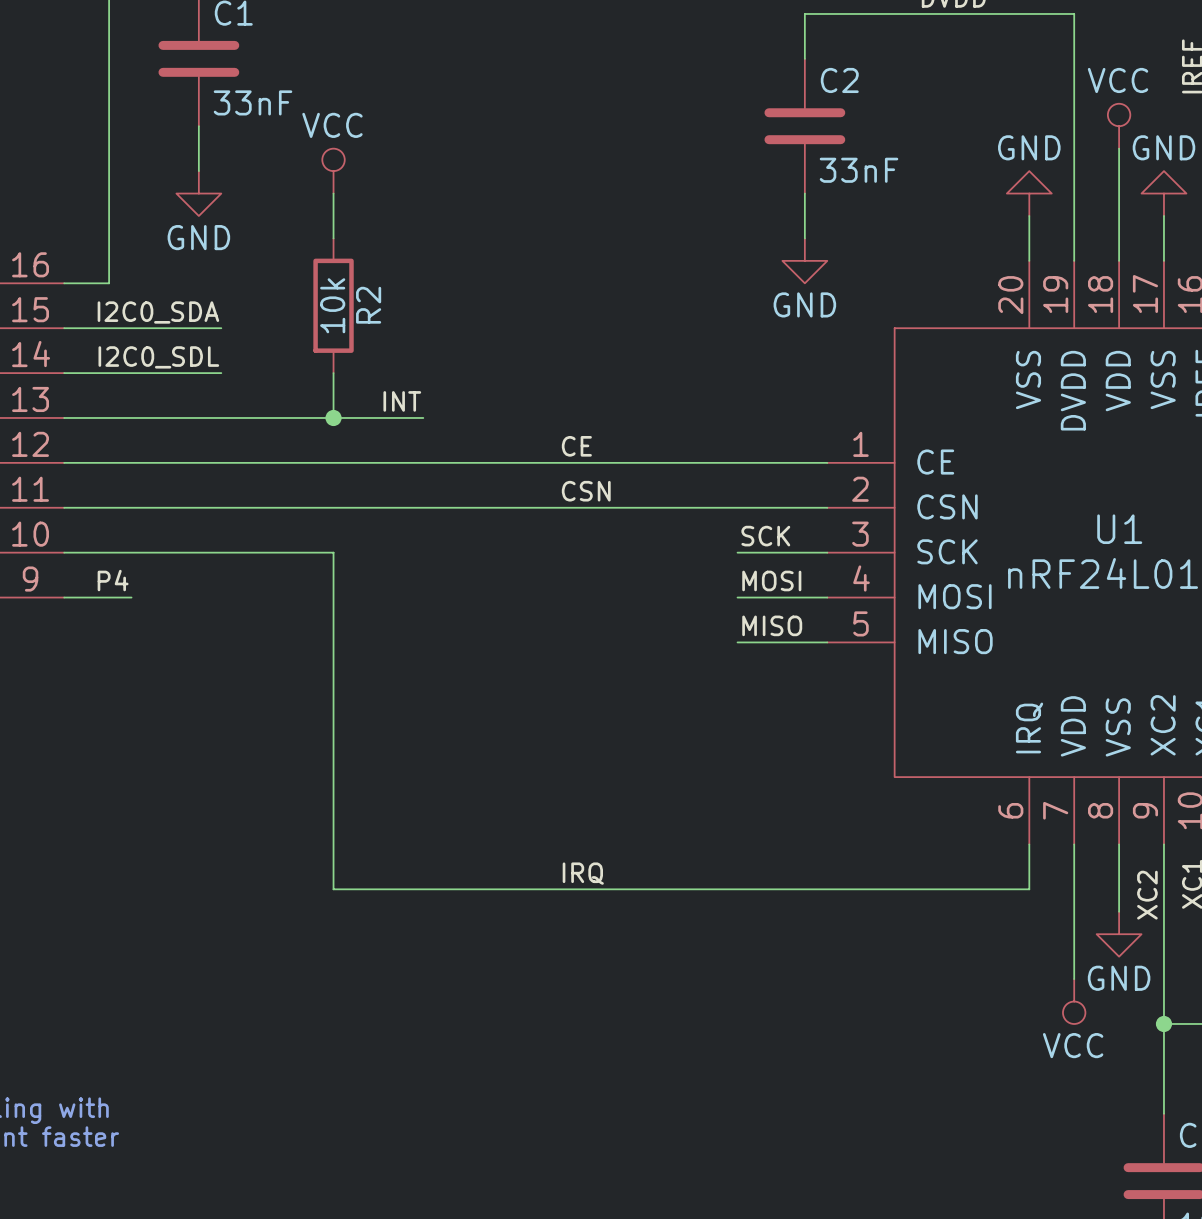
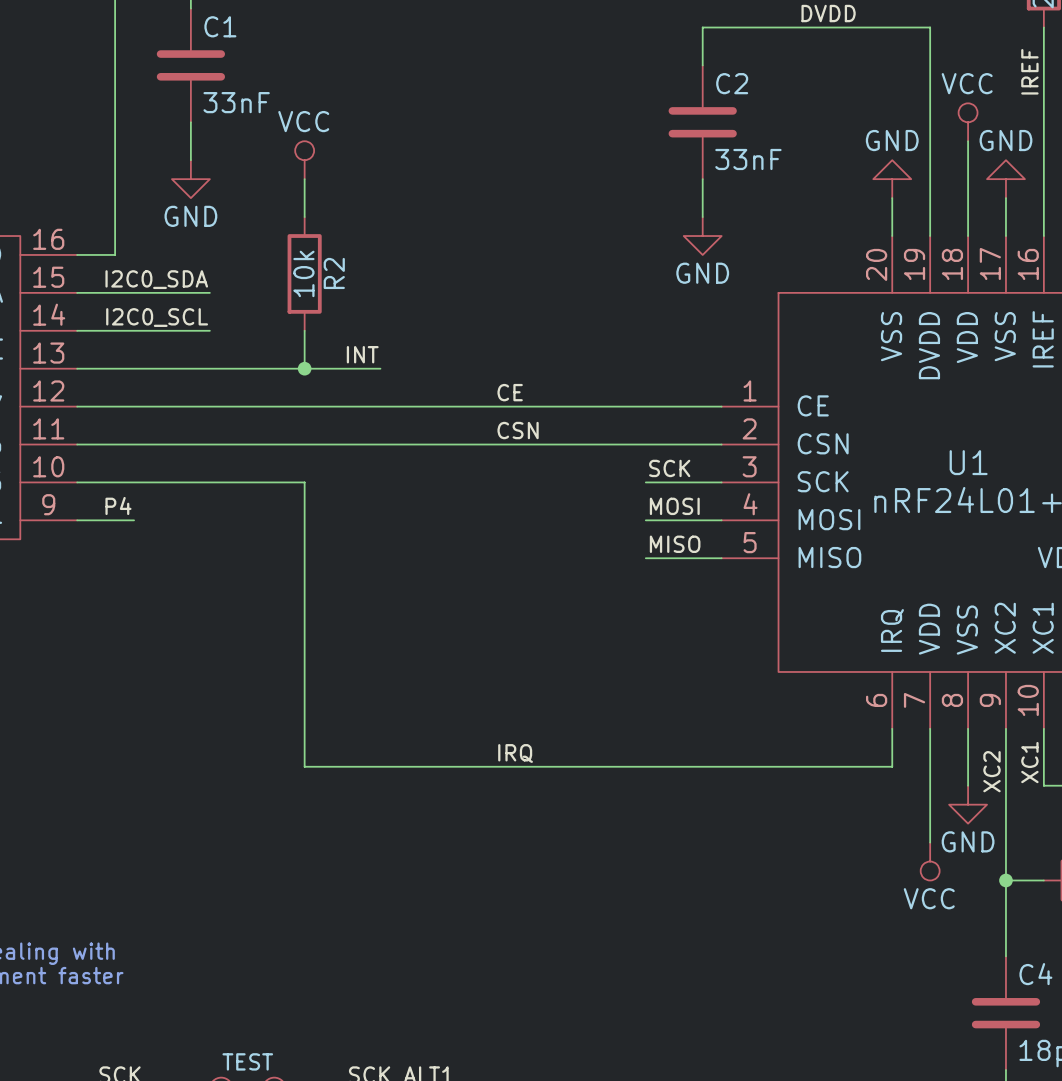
label: I2C0_SDL (158, 357) -> I2C0_SCL (157, 317)

